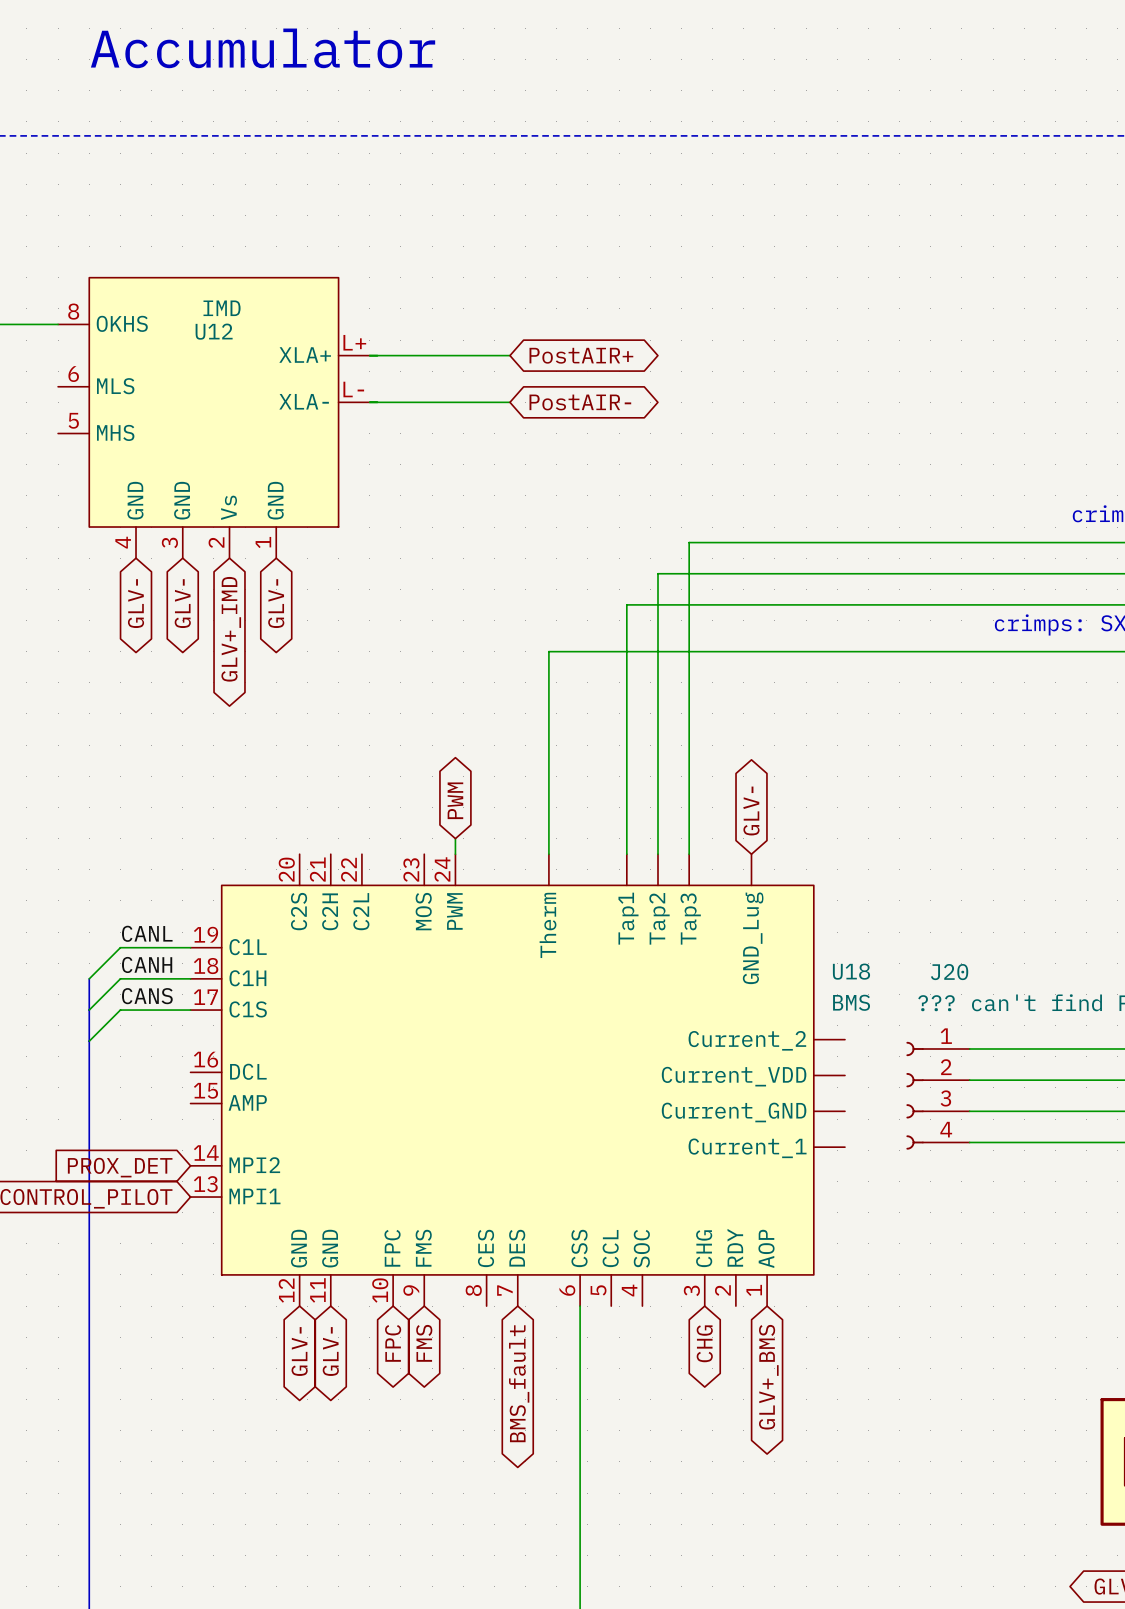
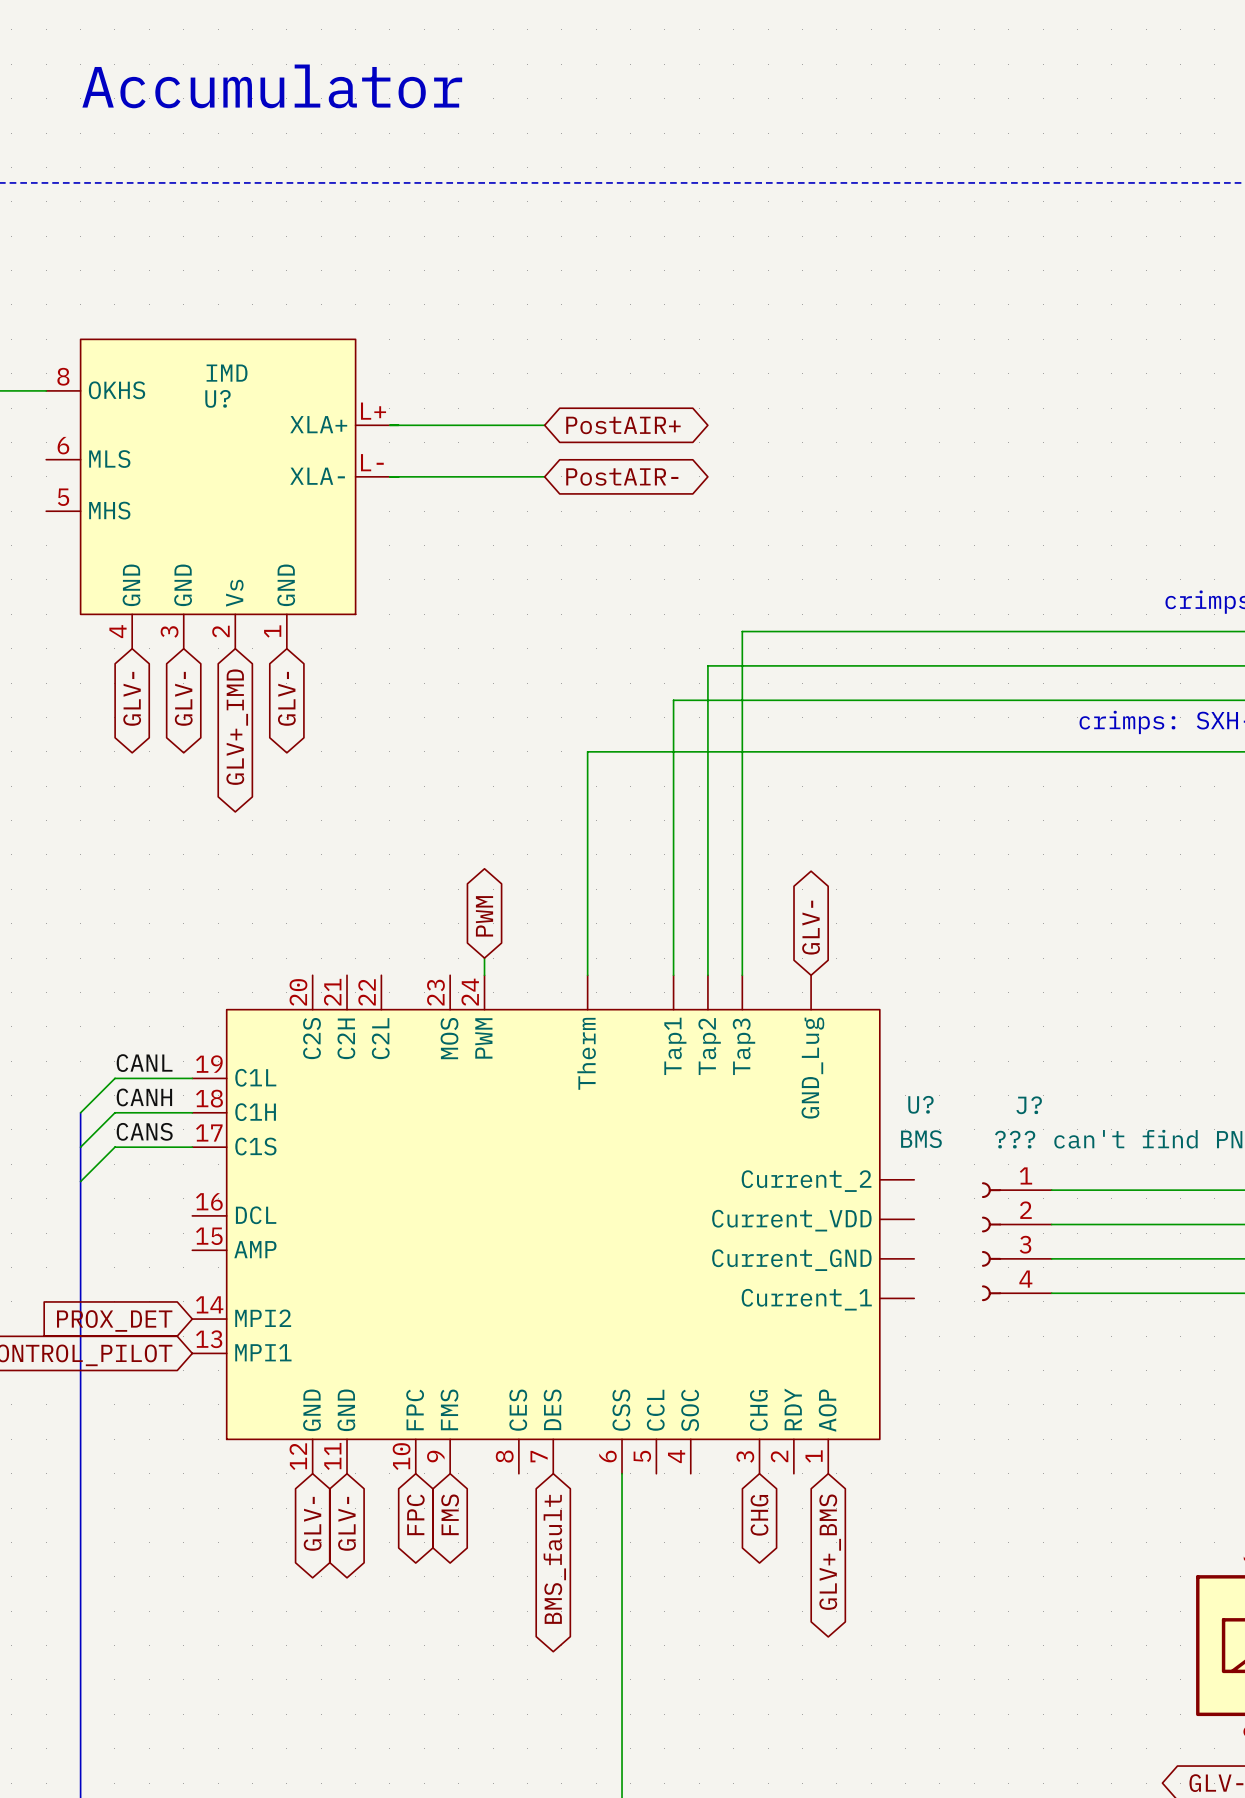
U12 name: U12 (214, 331) -> U? (217, 398)
U18 name: U18 (851, 971) -> U? (920, 1104)
J20 name: J20 (949, 972) -> J? (1029, 1105)

